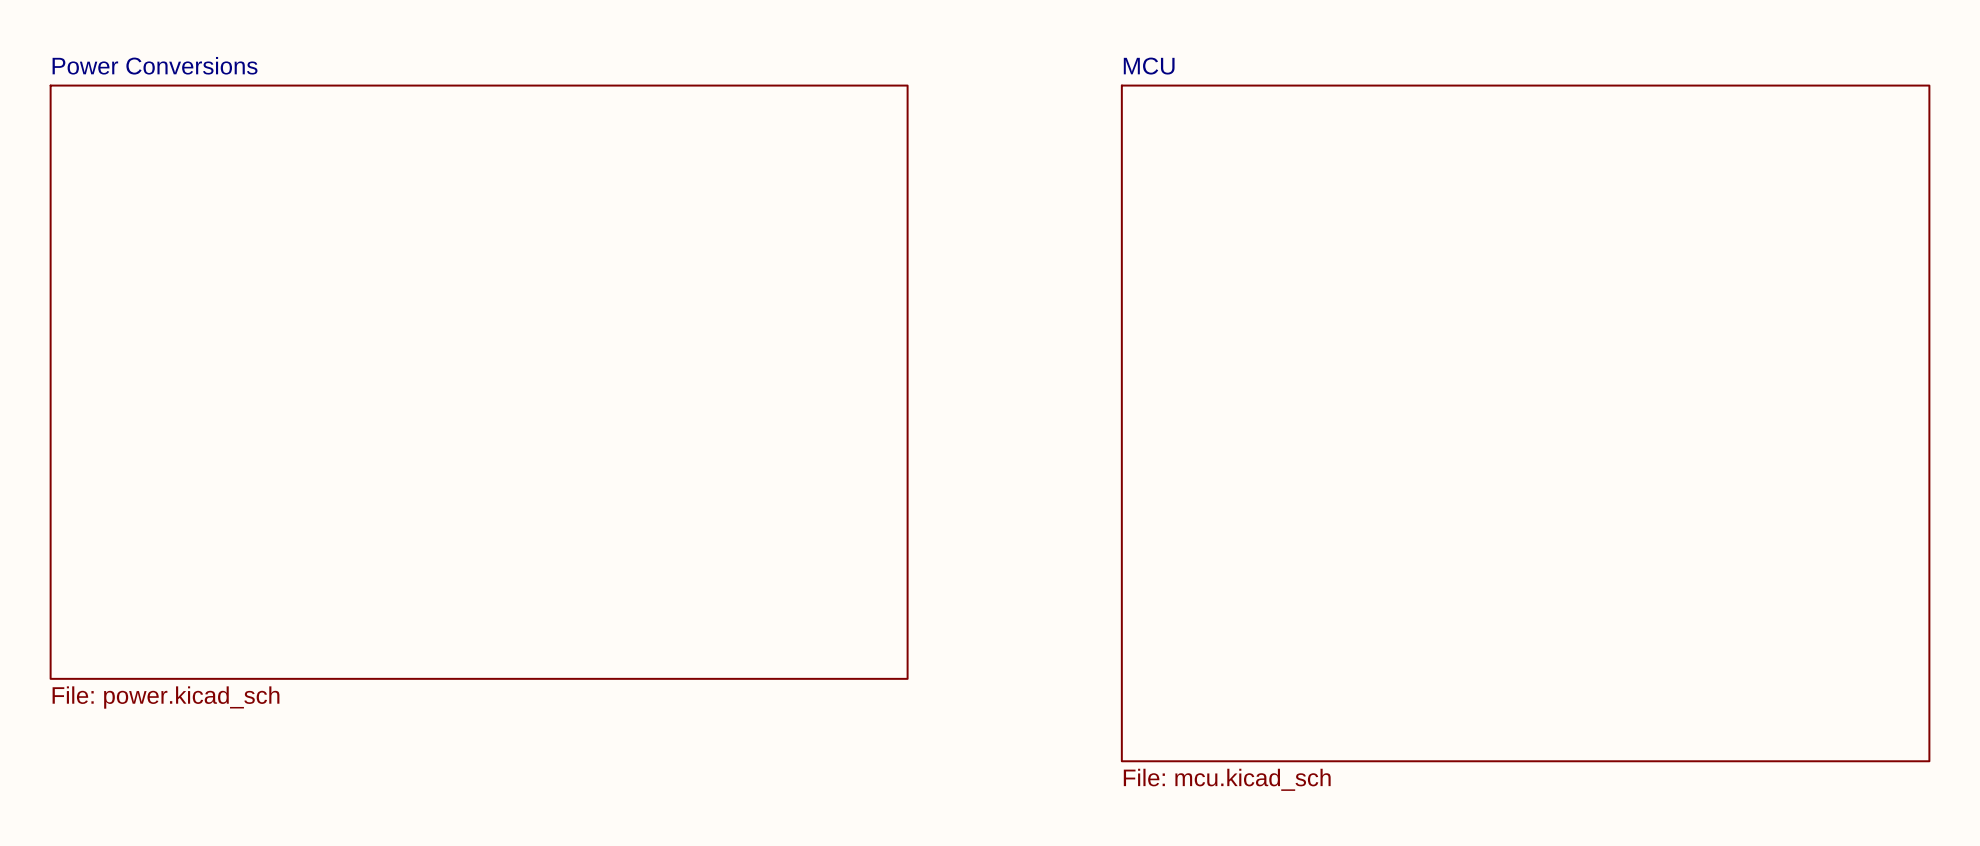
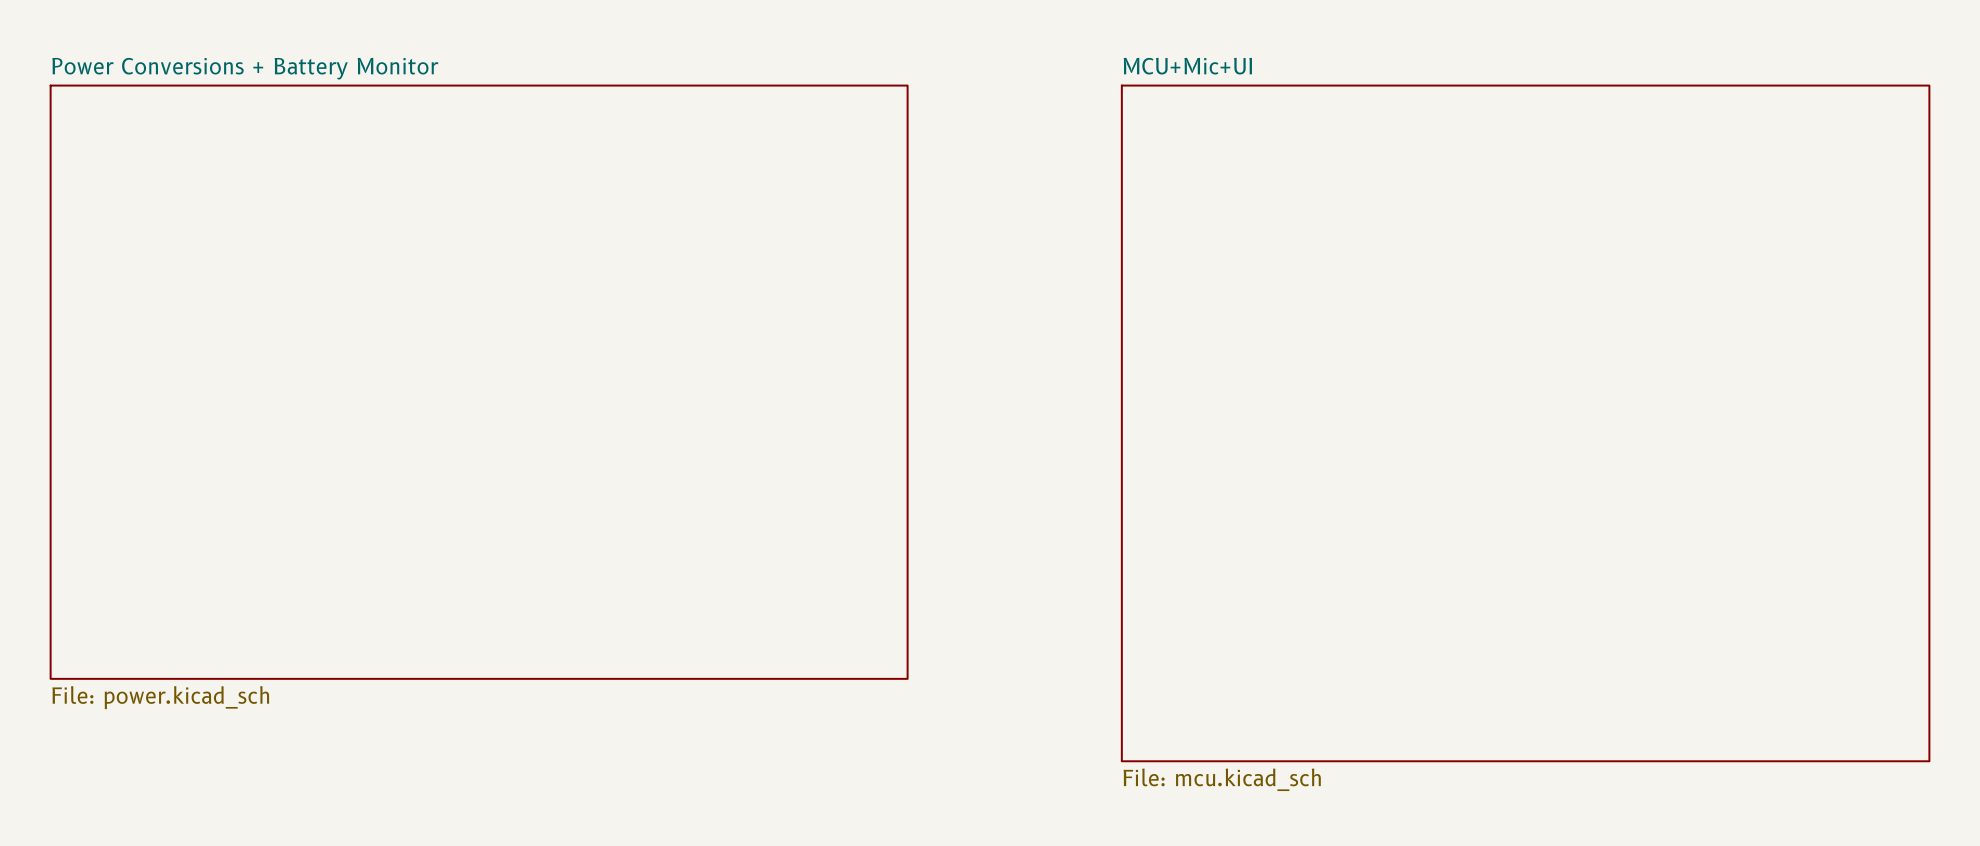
sheet Power Conversions name: Power Conversions (155, 65) -> Power Conversions + Battery Monitor (245, 68)
sheet MCU name: MCU (1149, 66) -> MCU+Mic+UI (1187, 66)

